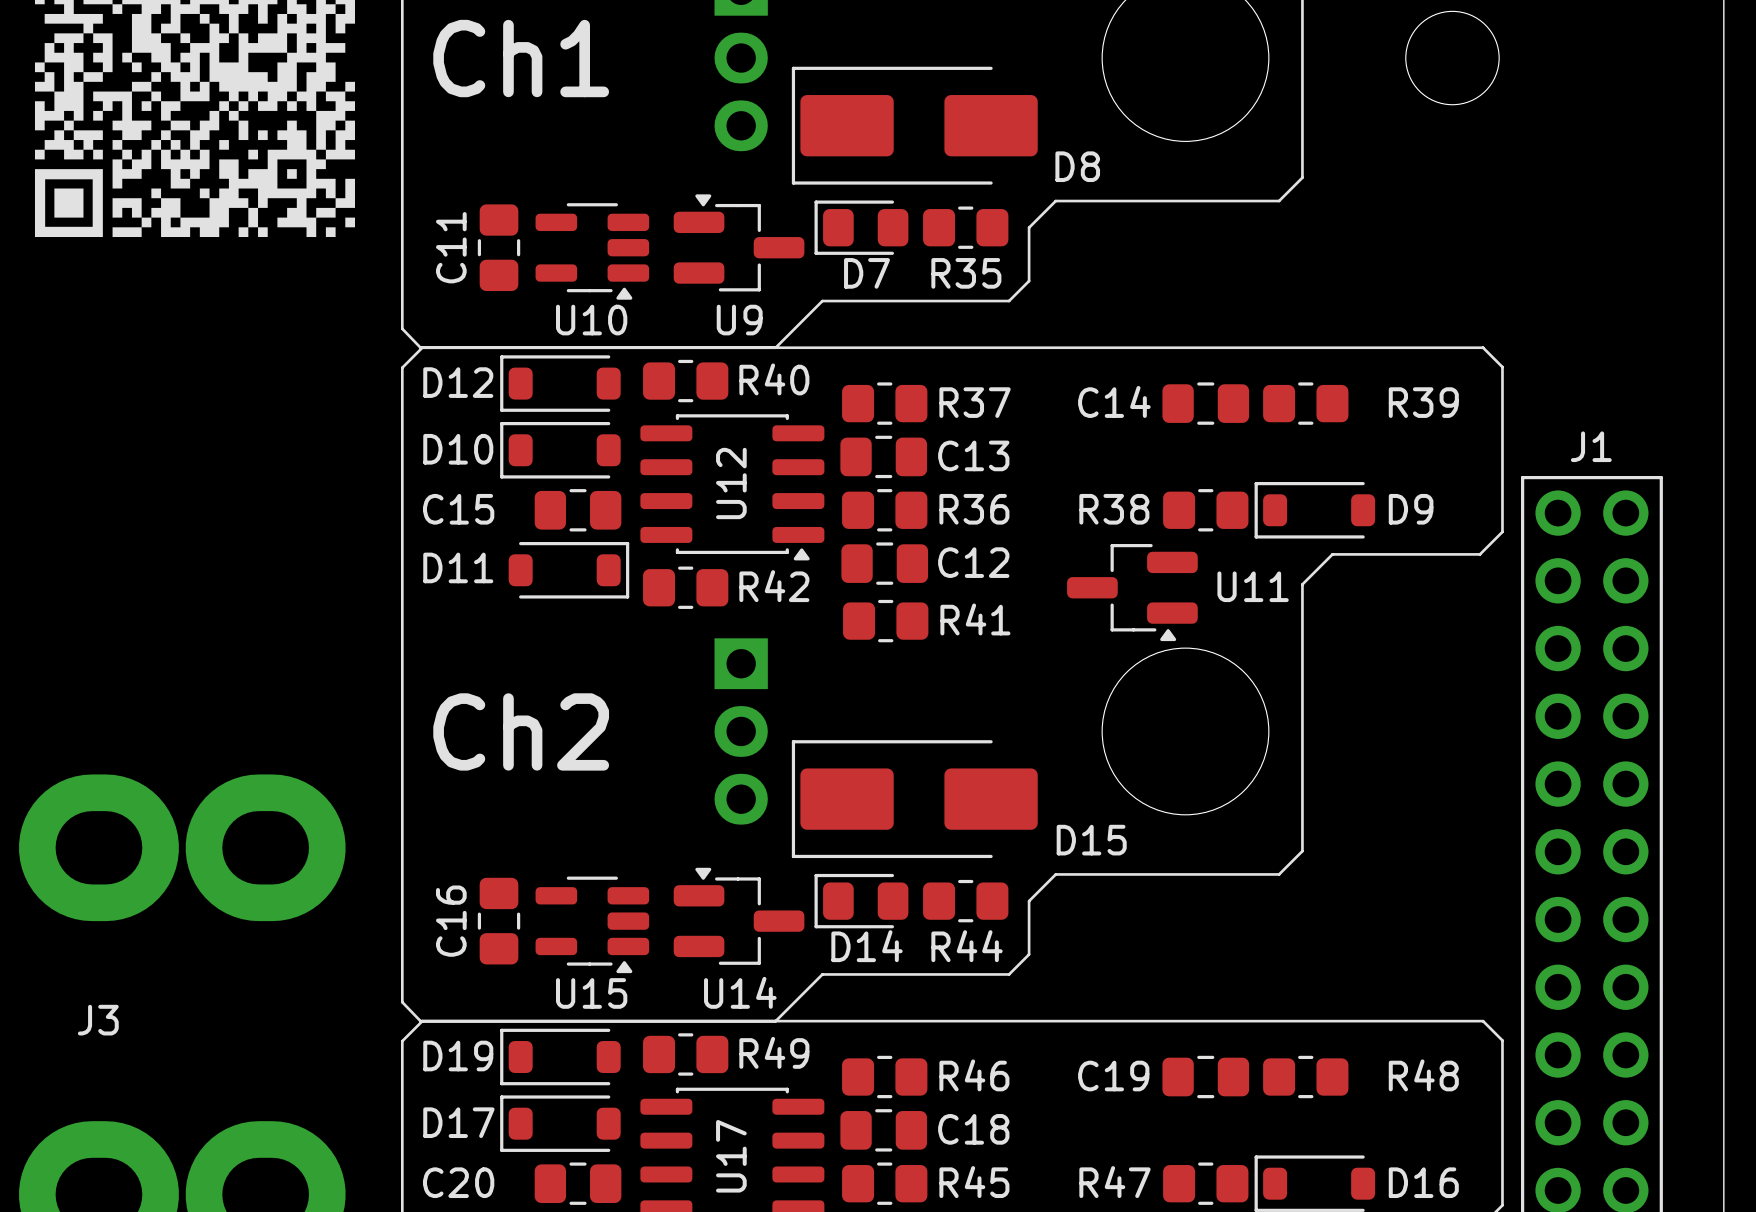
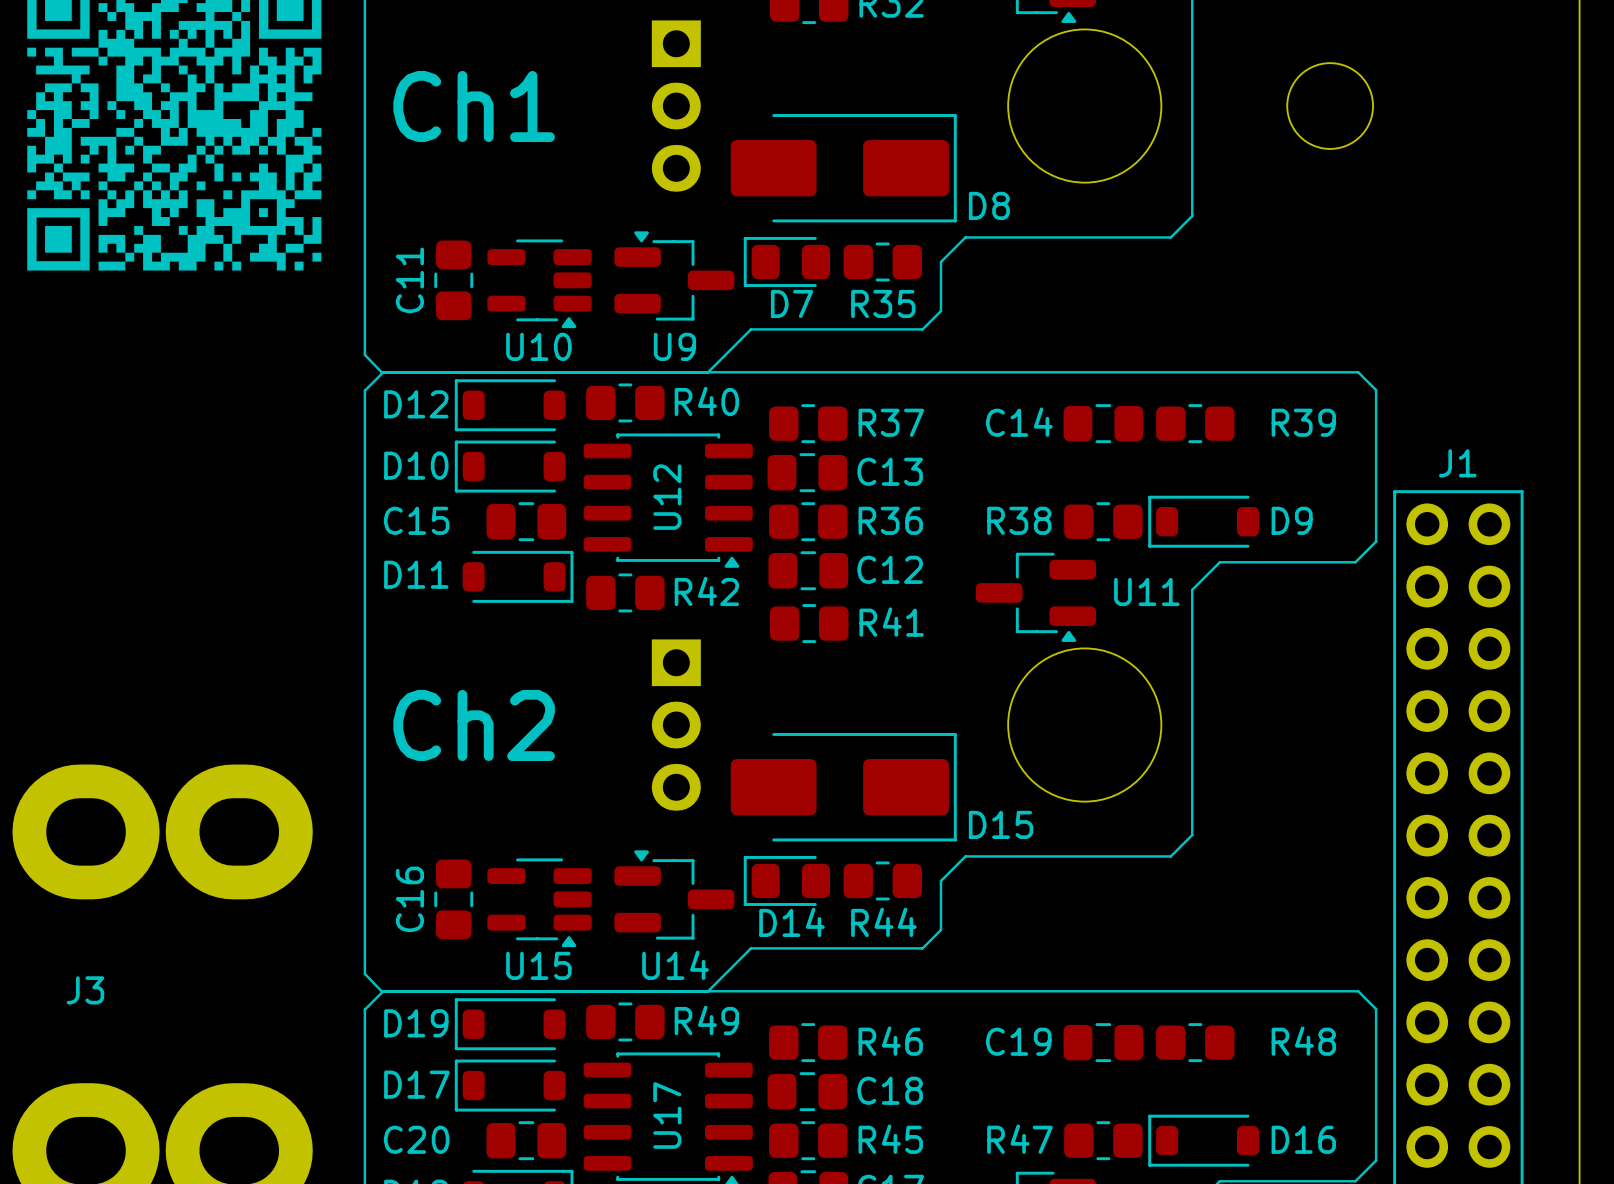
D8 rotation: 0° (914, 125) -> 180° (843, 168)
D15 rotation: 0° (914, 799) -> 180° (843, 787)

